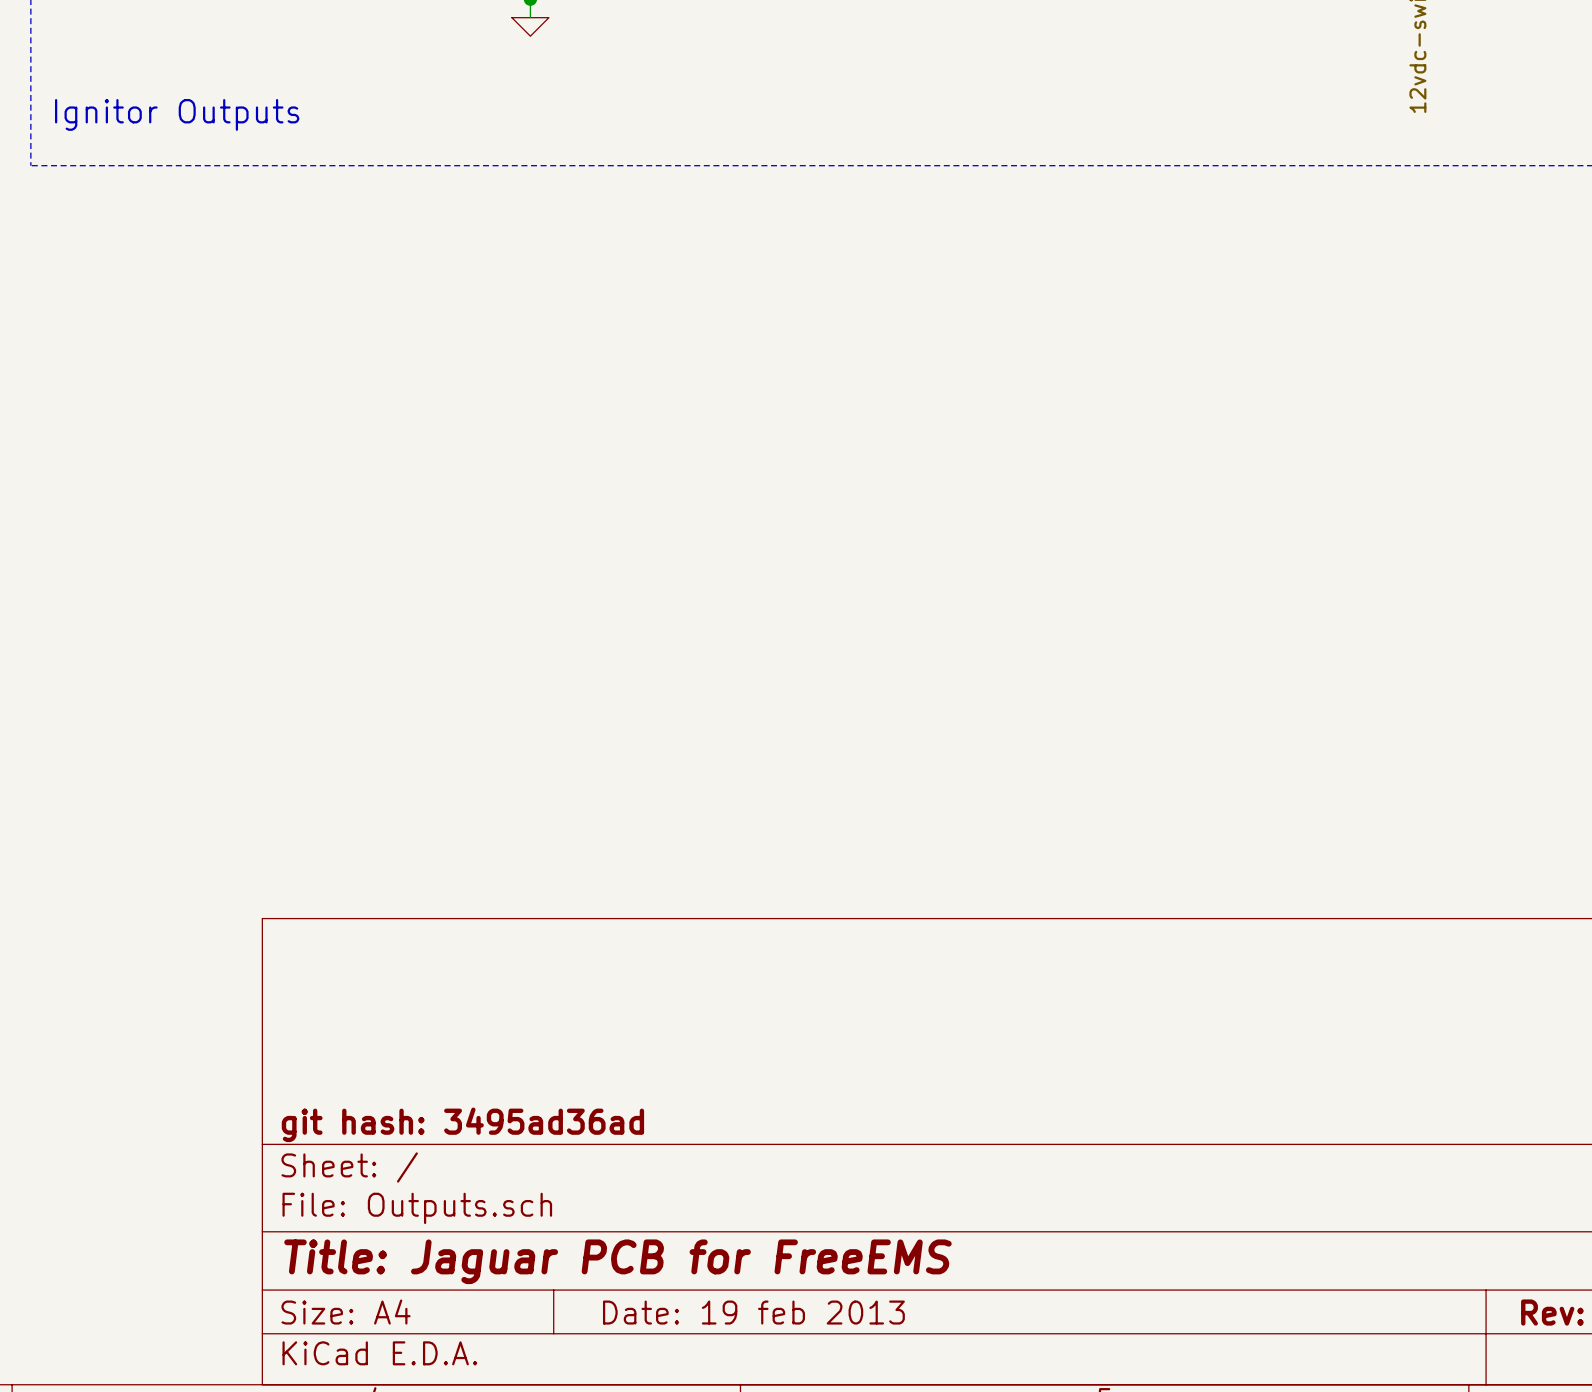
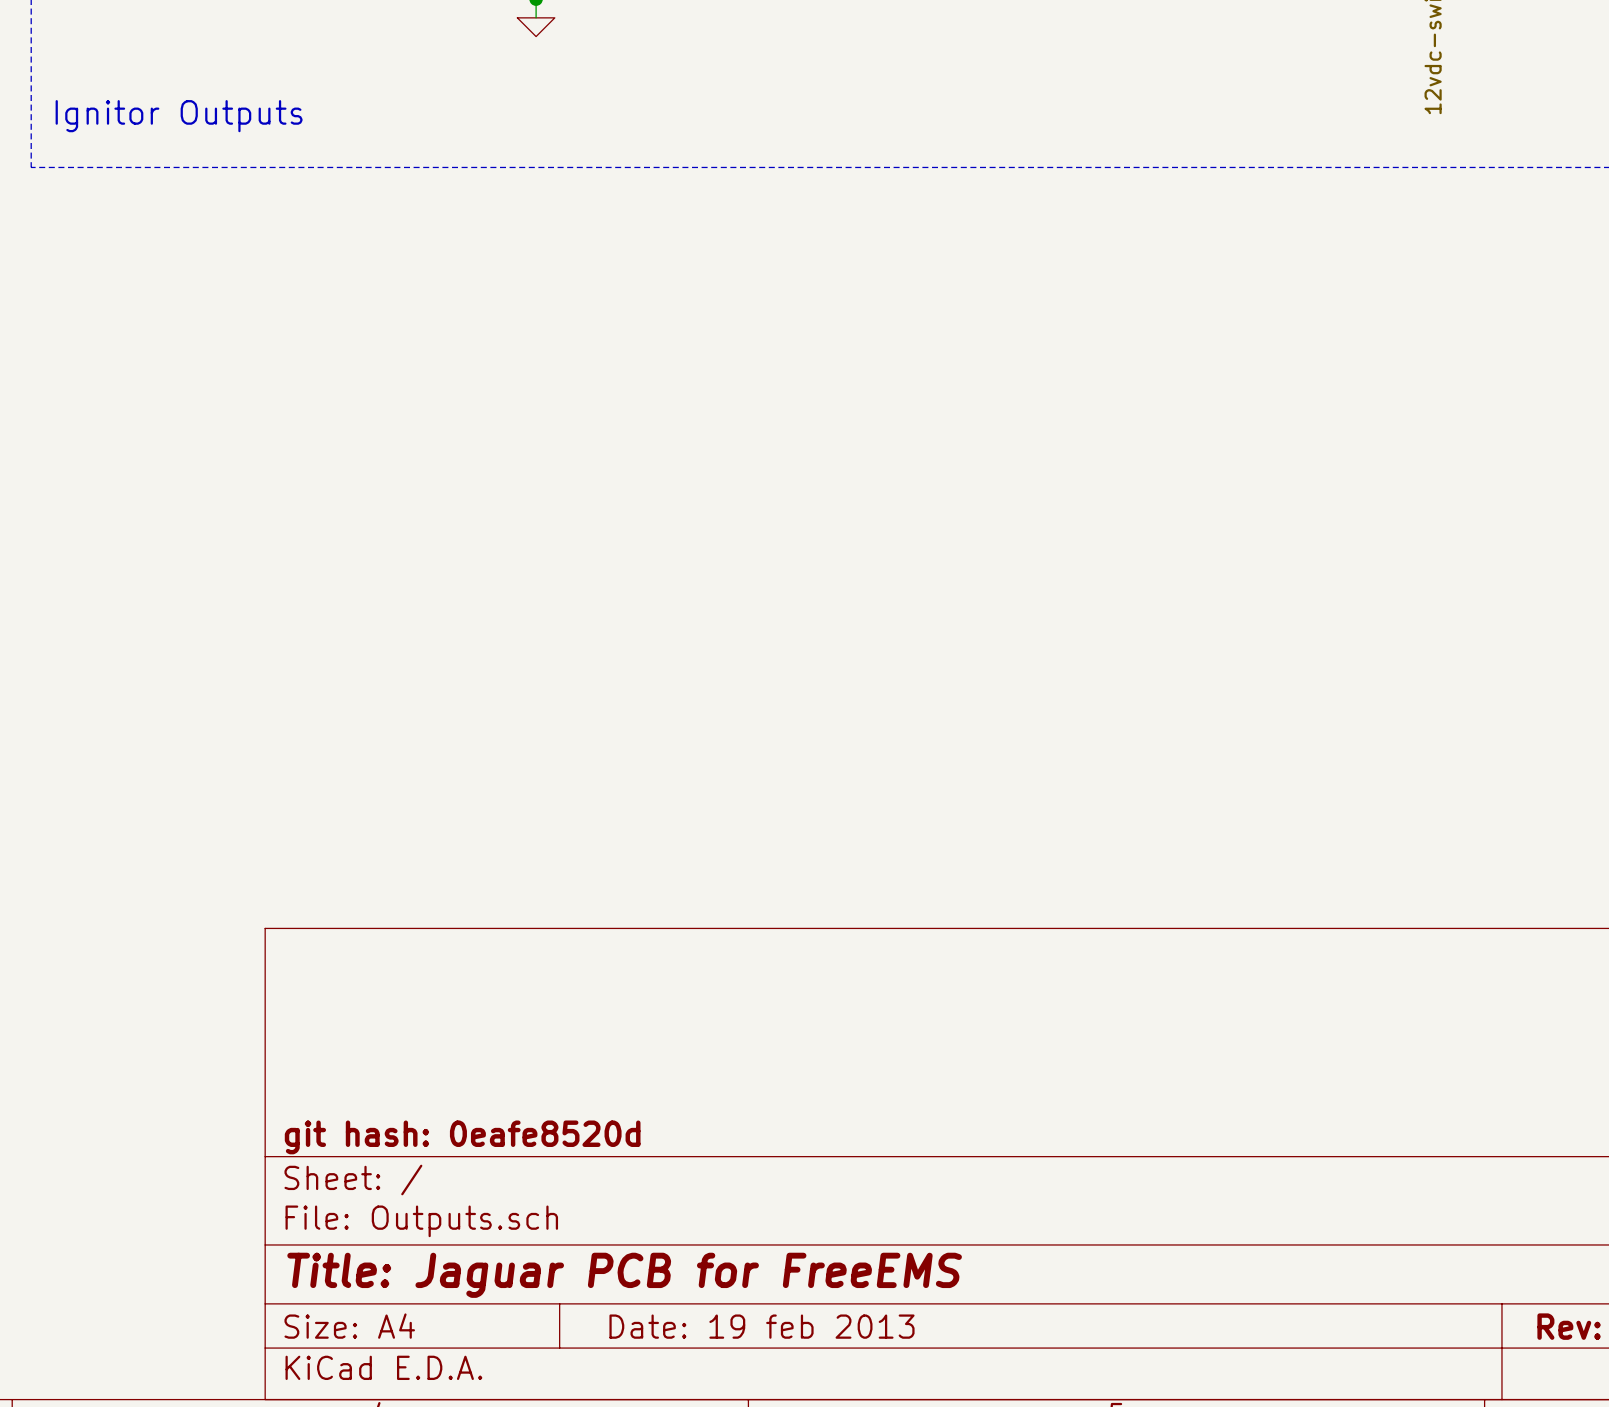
title block: git hash: 3495ad36ad (462, 1124) -> git hash: 0eafe8520d (462, 1137)

